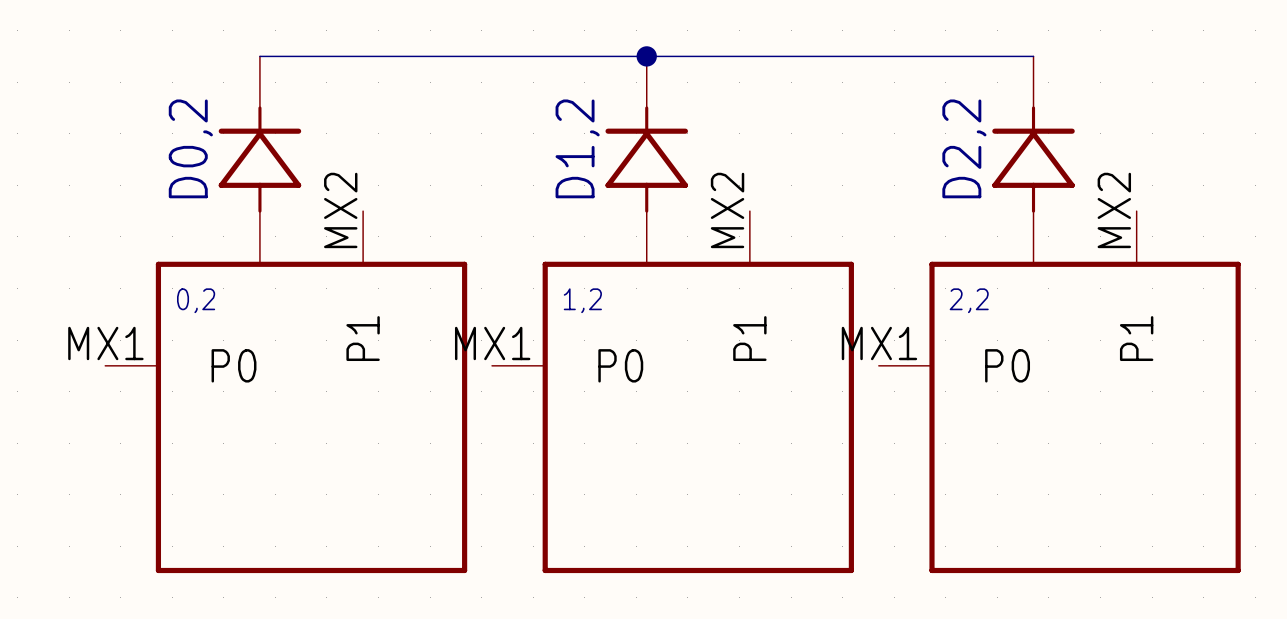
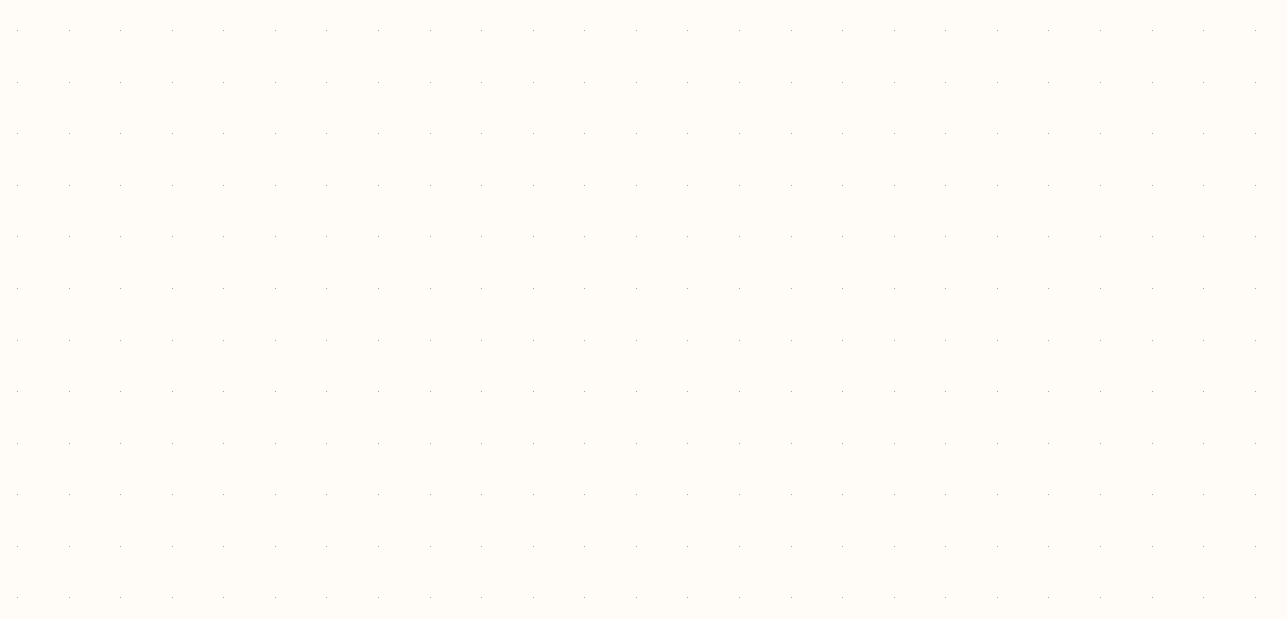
wire: (259, 56) (1033, 56) -> none
junction: (646, 56) -> none
D0,2: (259, 159) -> none
D1,2: (646, 159) -> none
D2,2: (1033, 159) -> none
0,2: (286, 392) -> none
1,2: (672, 392) -> none
2,2: (1059, 392) -> none

